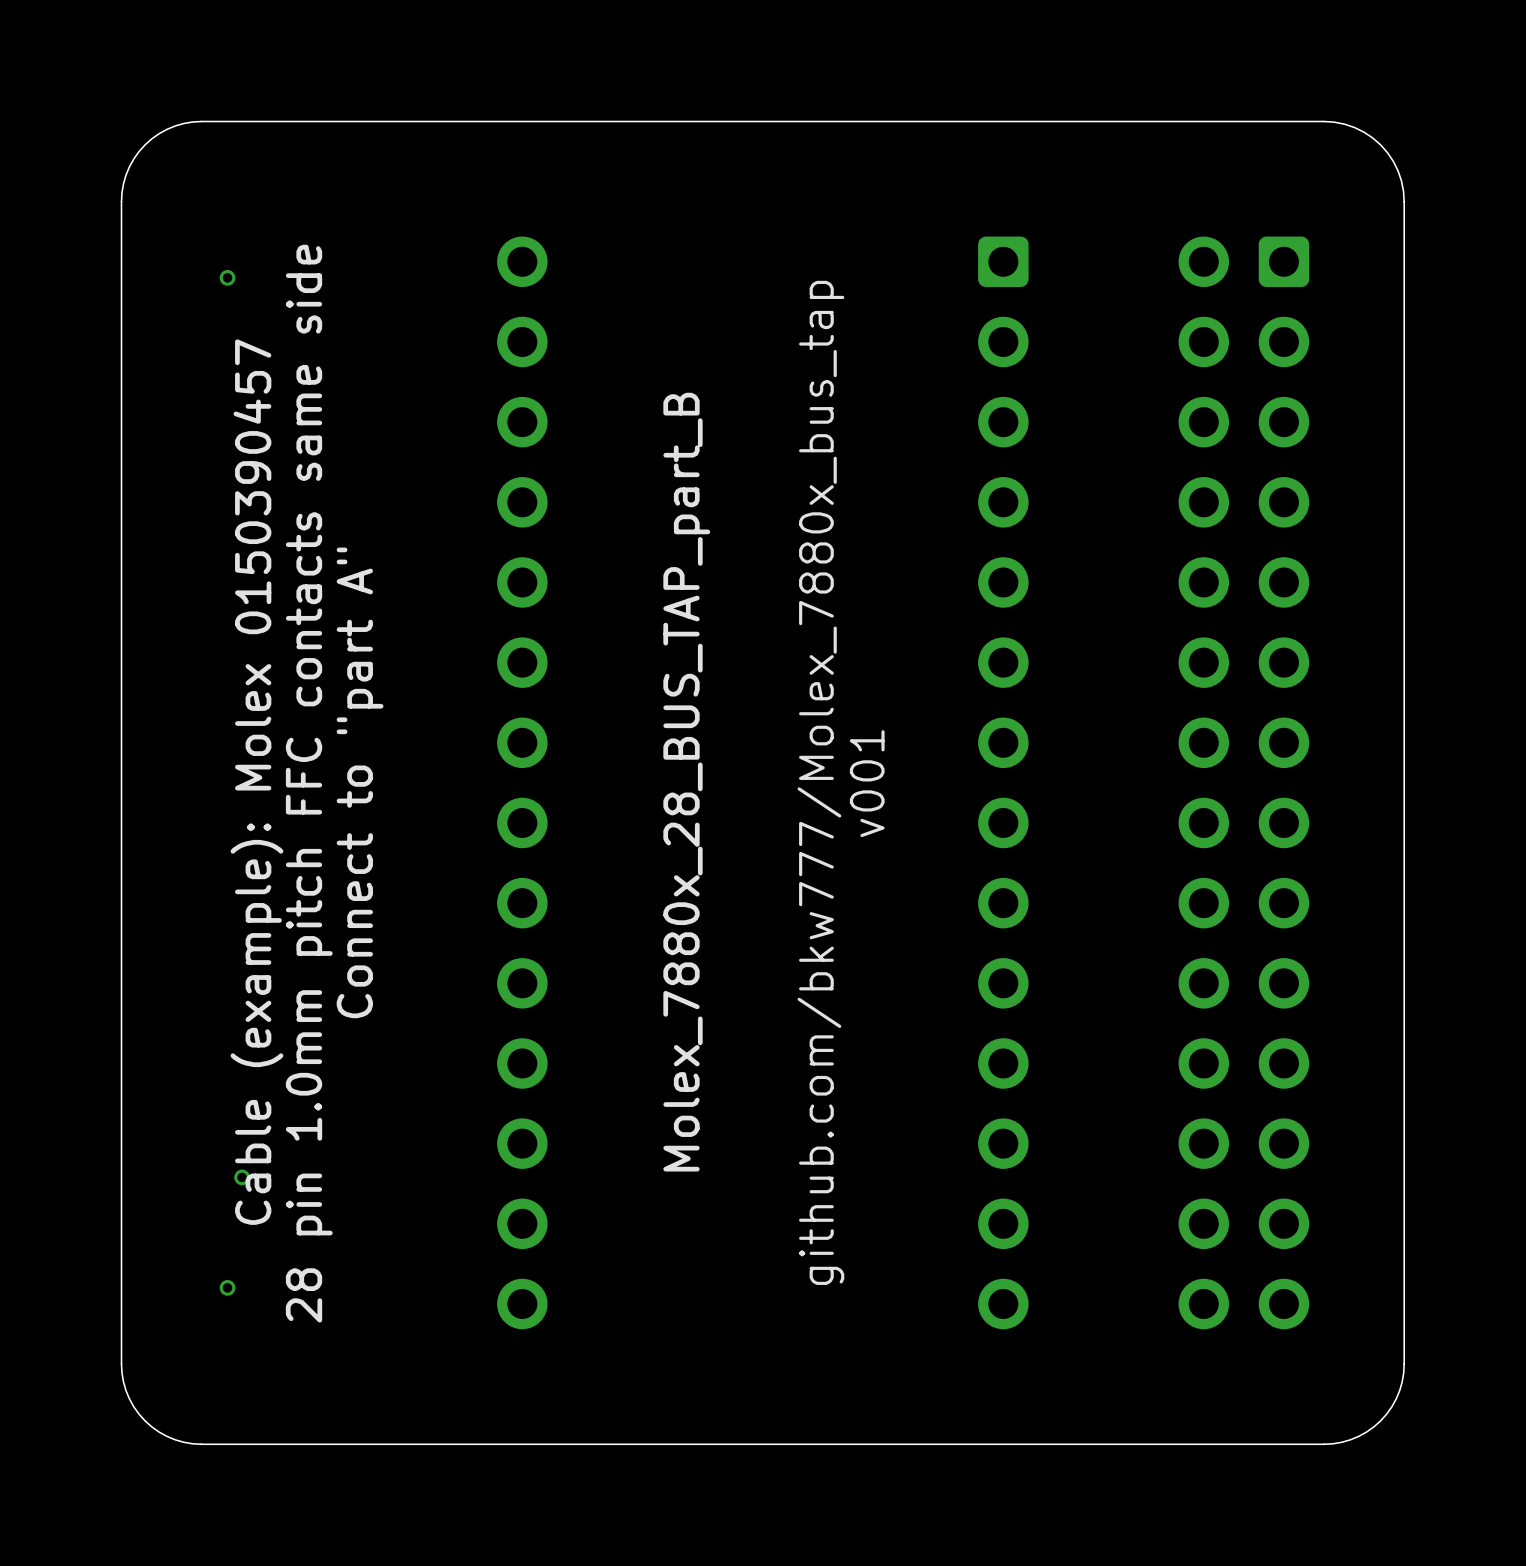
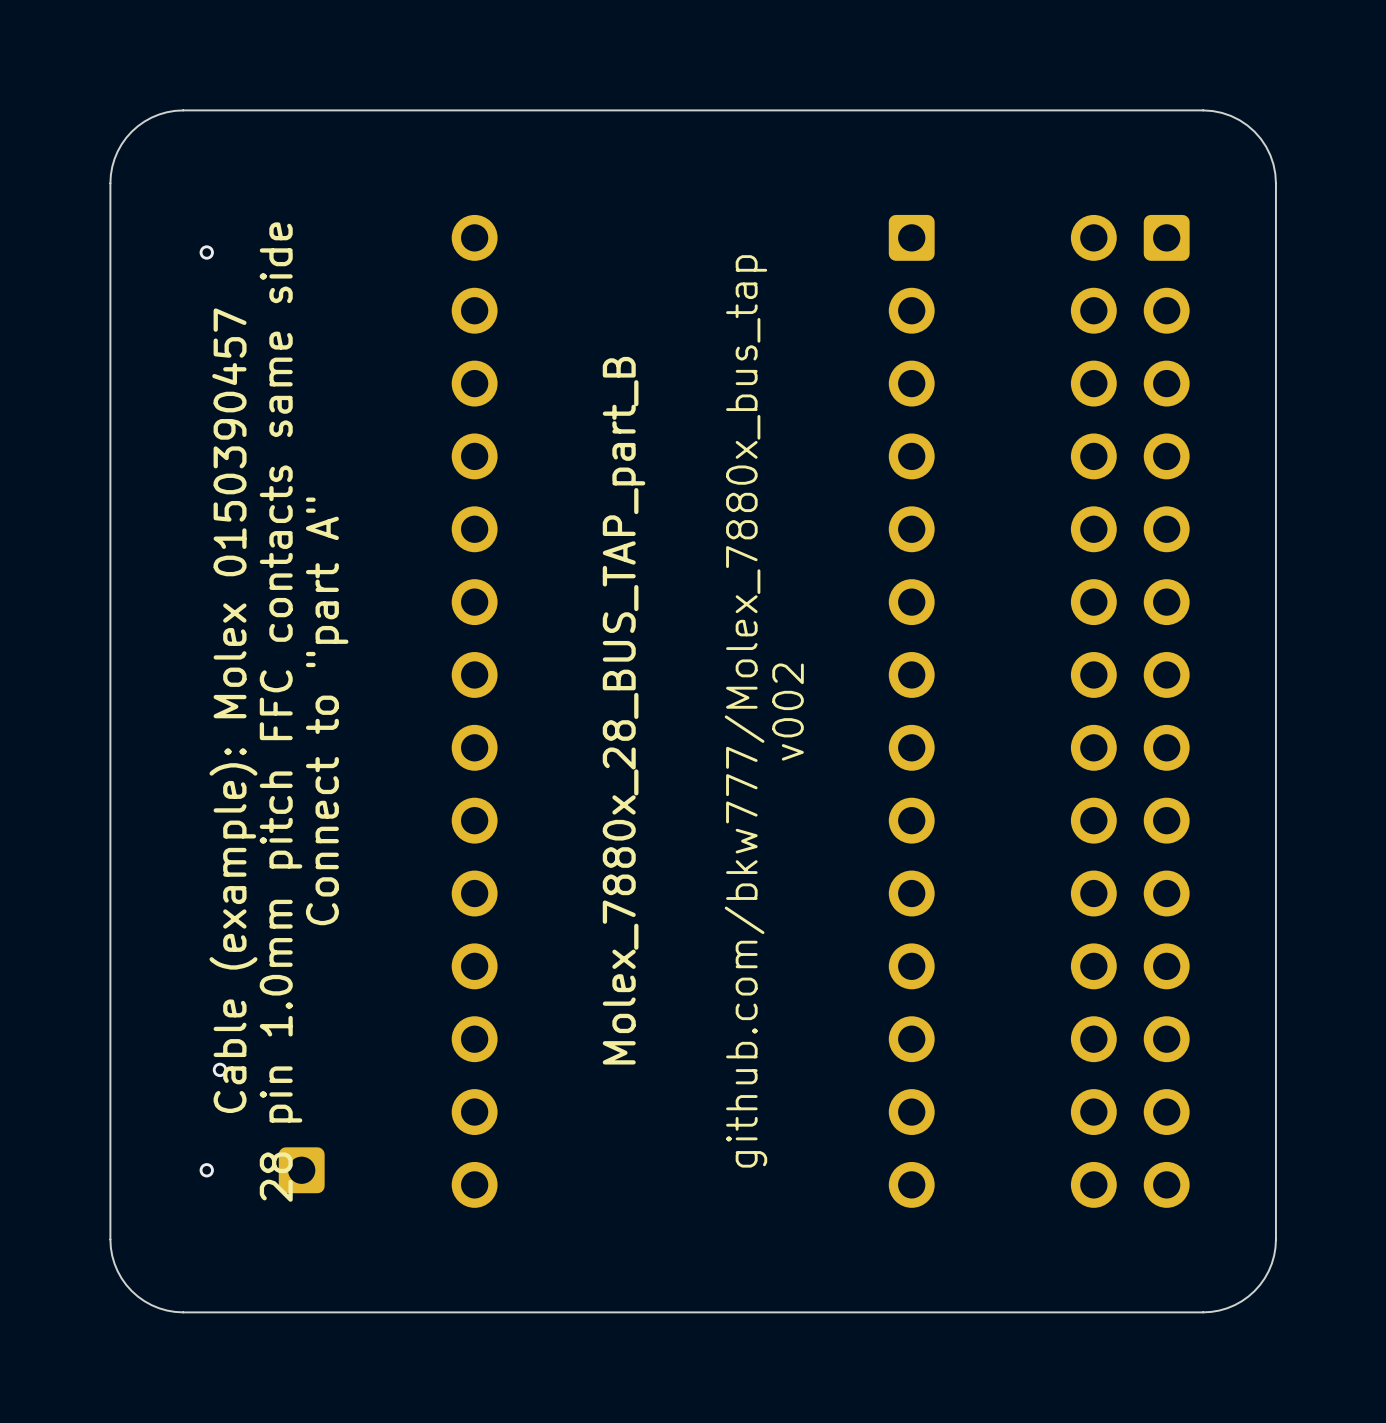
text: v001 (867, 783) -> v002 (788, 712)
part: none -> (301, 1170)

